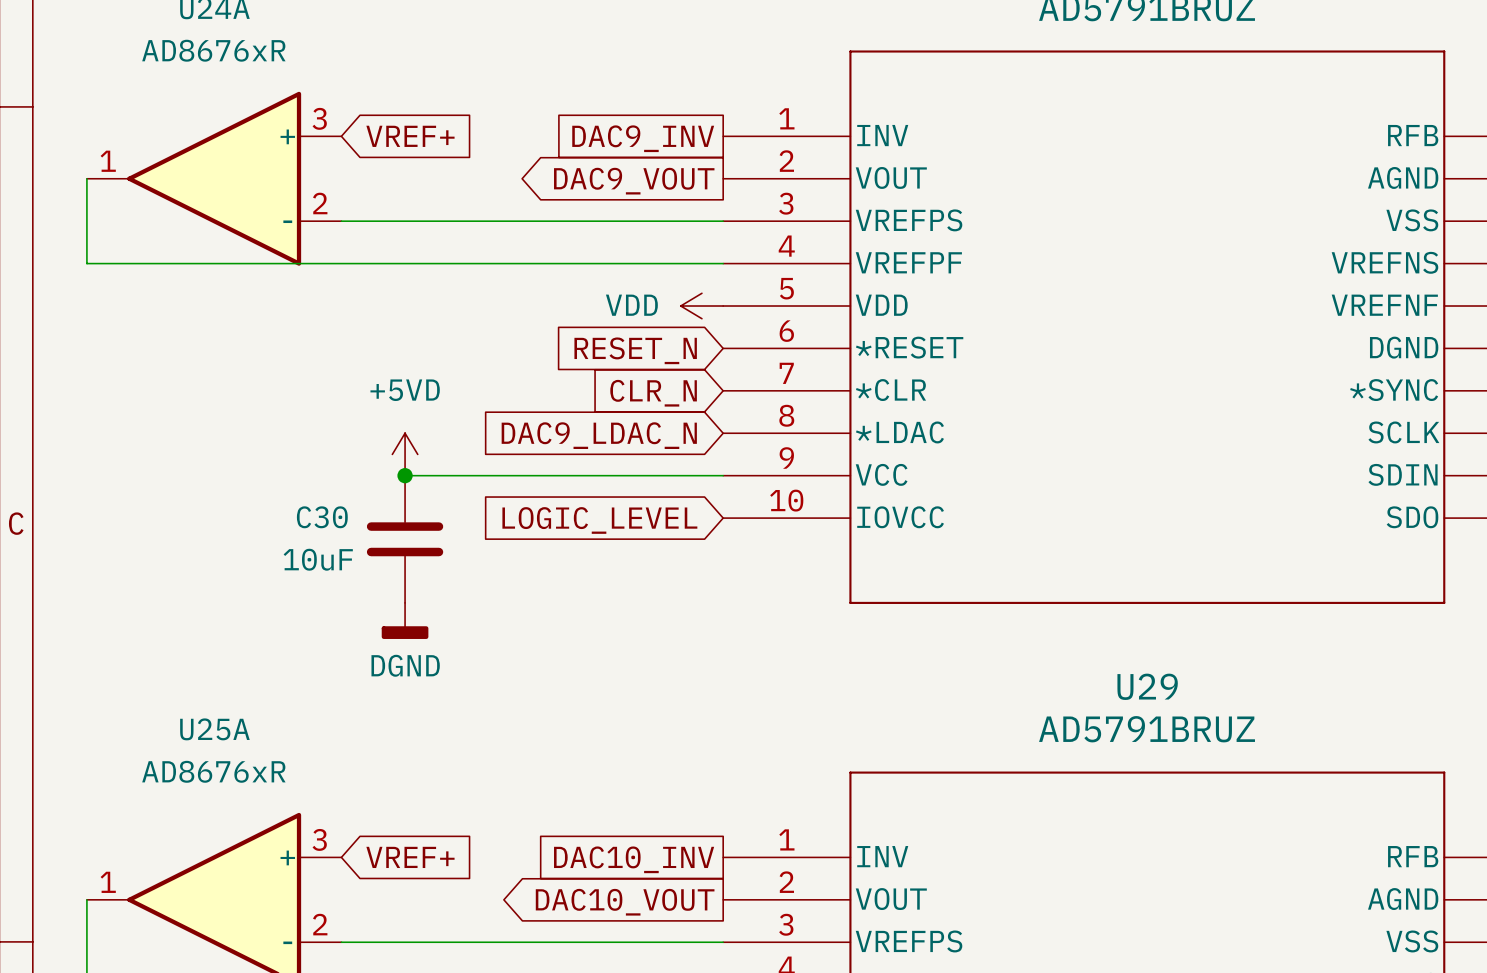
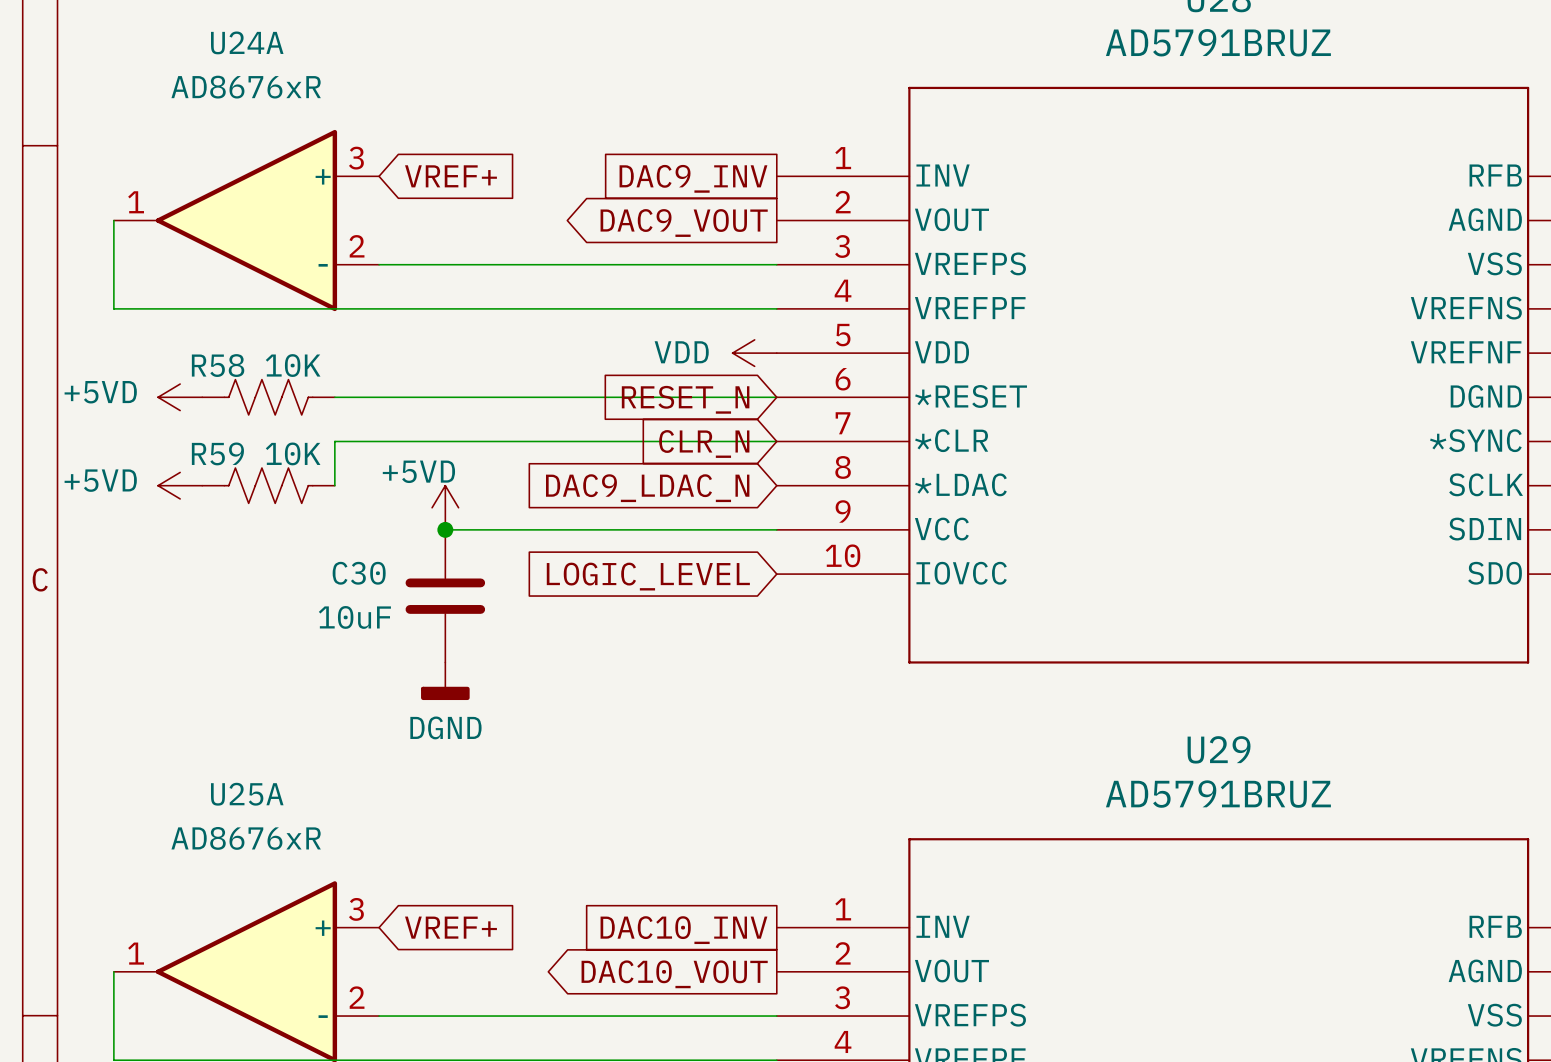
power symbol: none -> +5VD (180, 397)
R58: none -> 10K (268, 397)
wire: none -> (334, 397) (776, 397)
power symbol text position: +5VD (405, 390) -> +5VD (418, 471)
wire: none -> (776, 441) (334, 441) (334, 485)
power symbol: none -> +5VD (180, 485)
R59: none -> 10K (268, 485)

